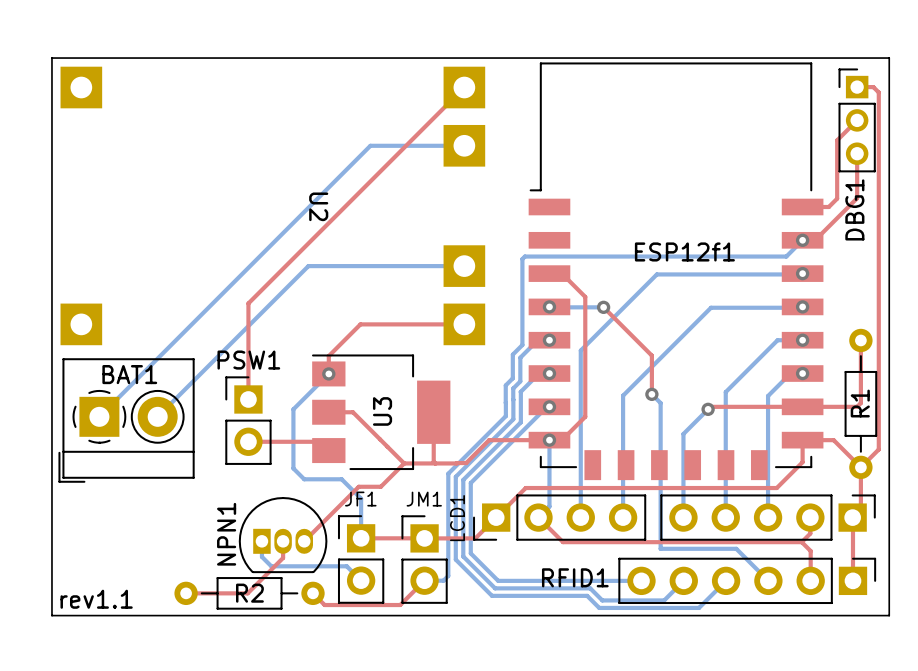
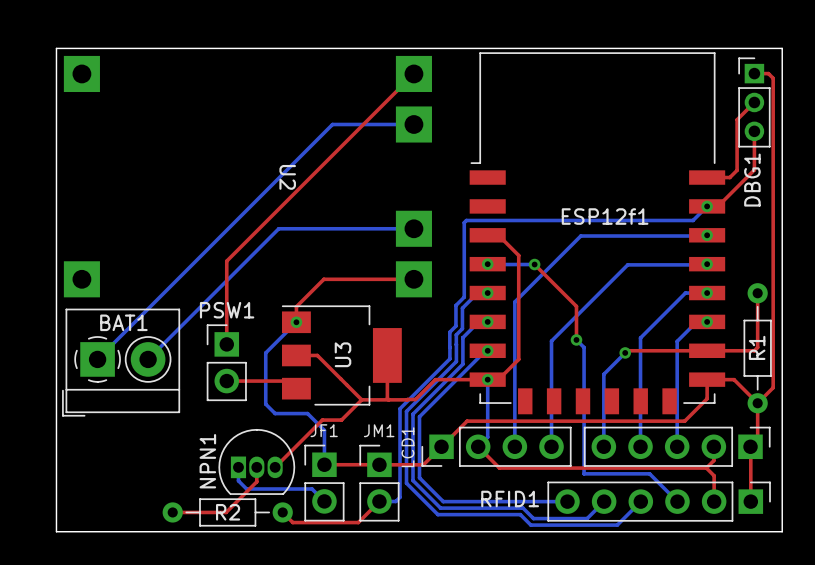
text: rev1.1 (96, 599) -> none

